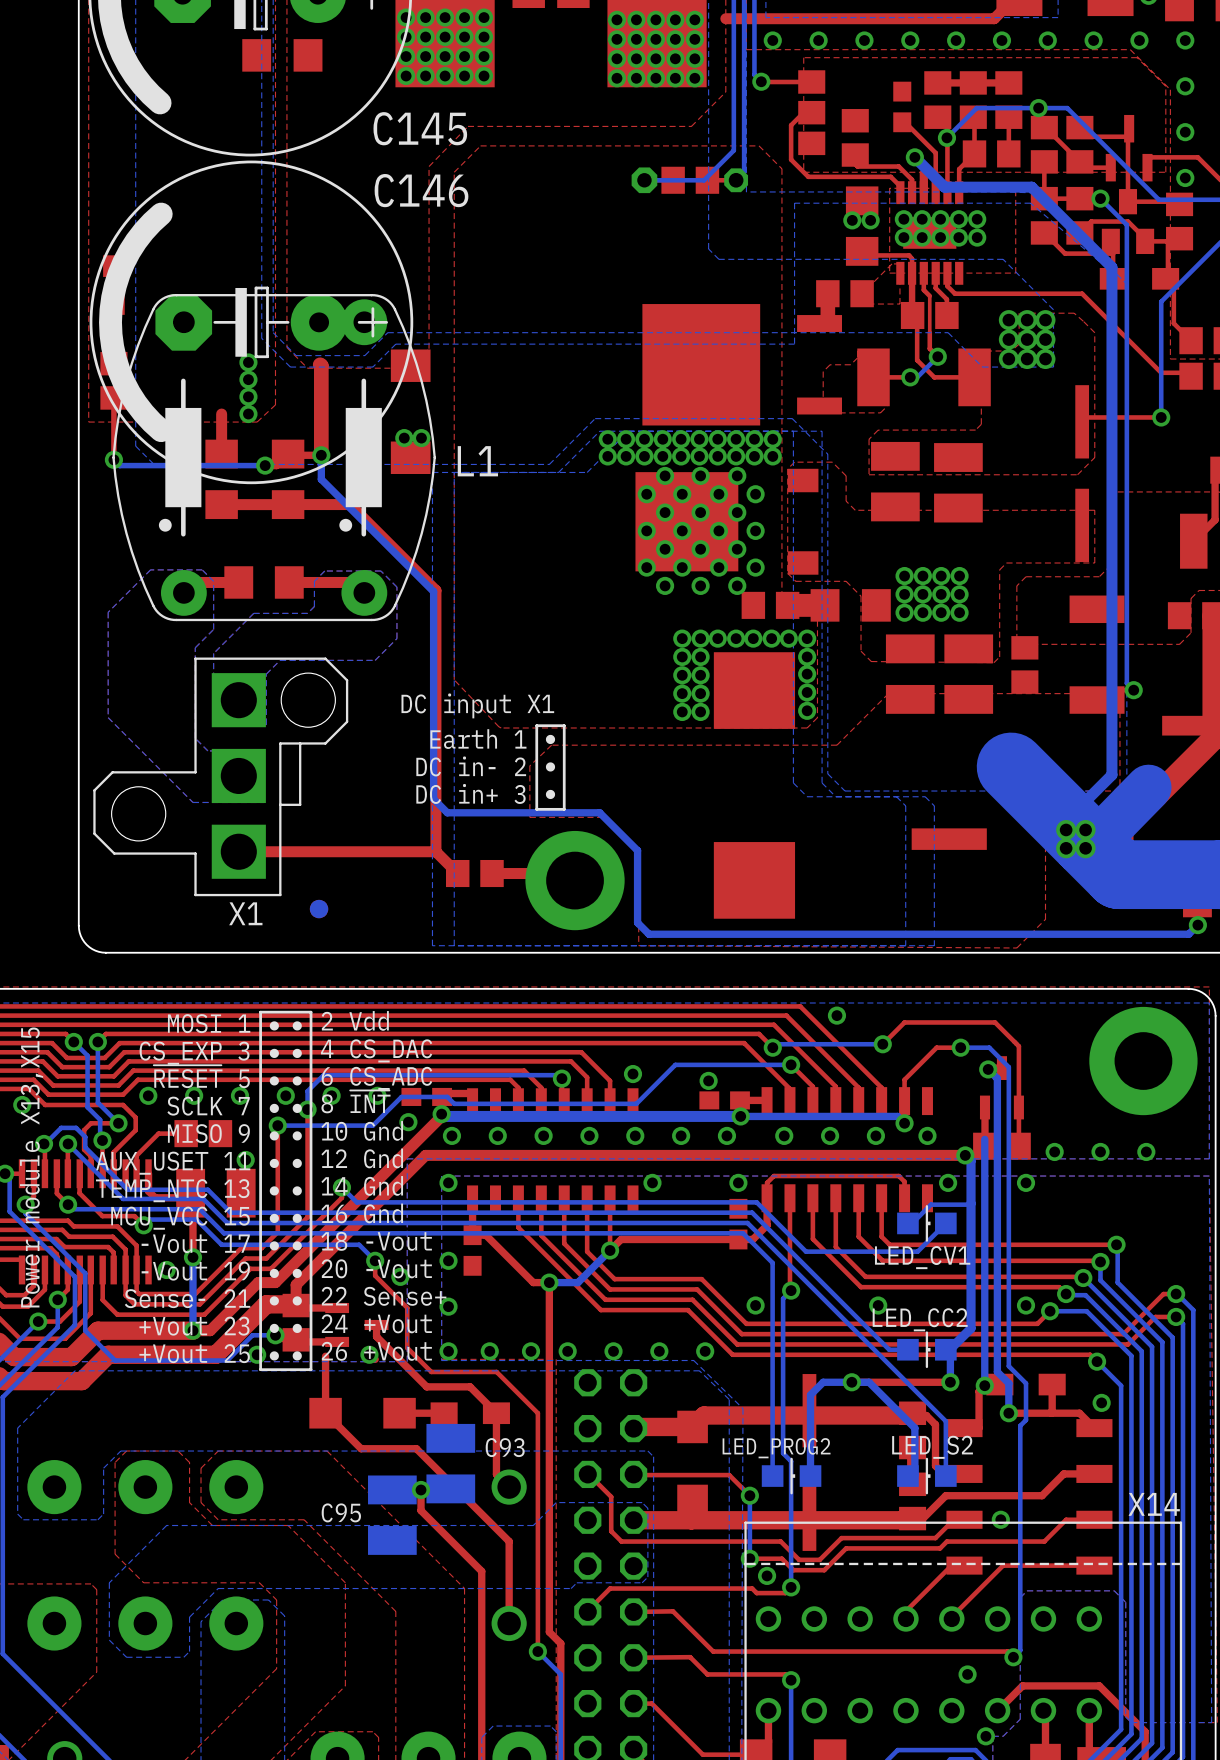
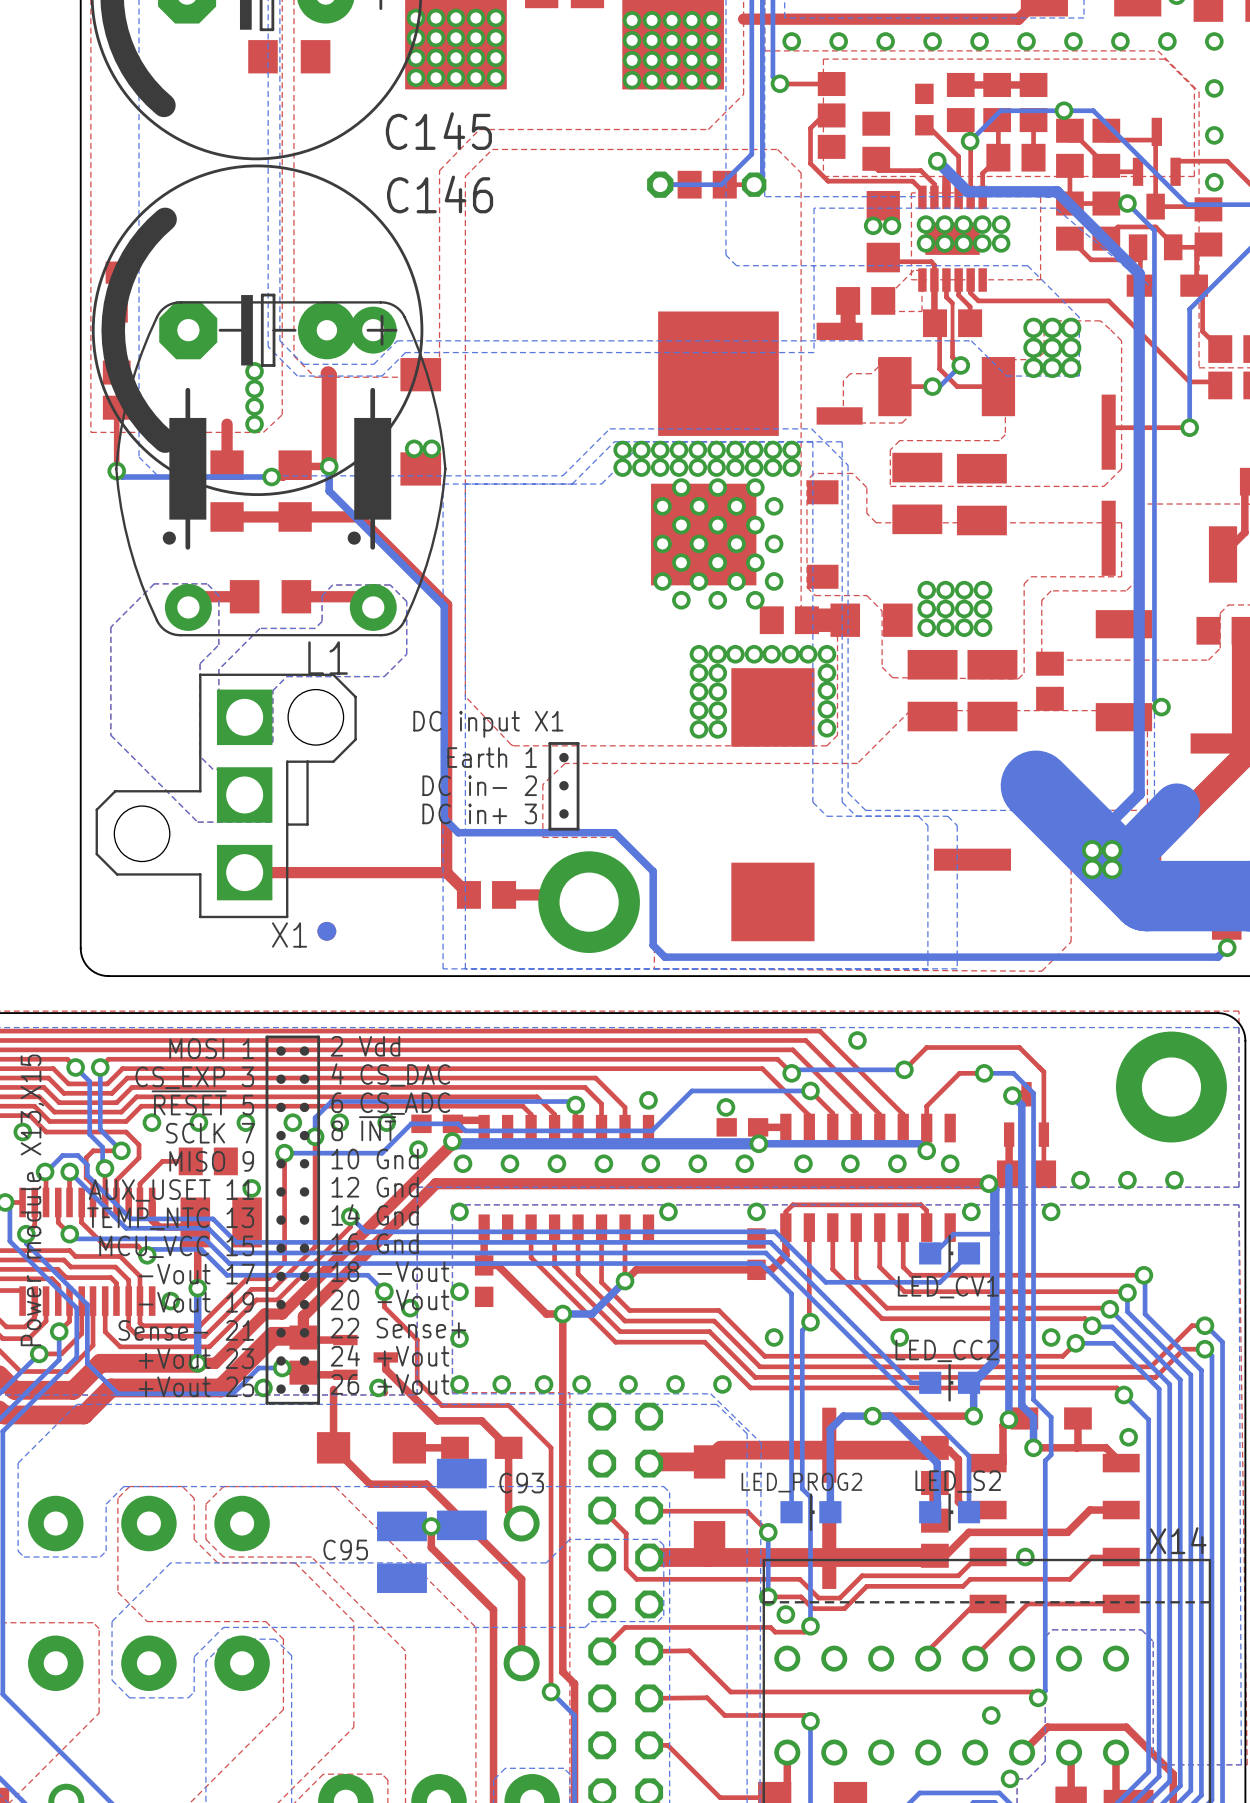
L1 name position: L1 (477, 461) -> L1 (328, 658)
X1 name position: X1 (245, 913) -> X1 (289, 935)

